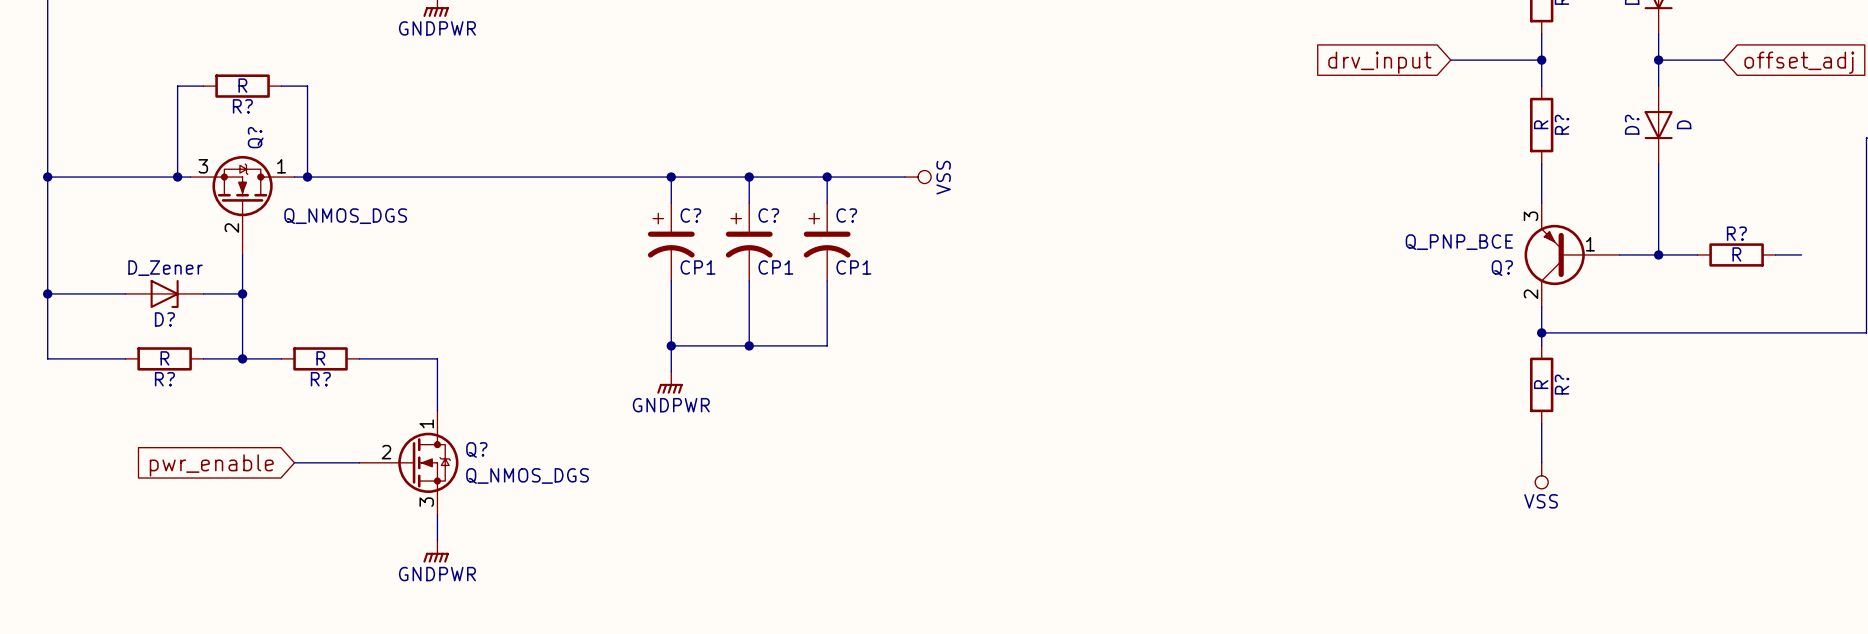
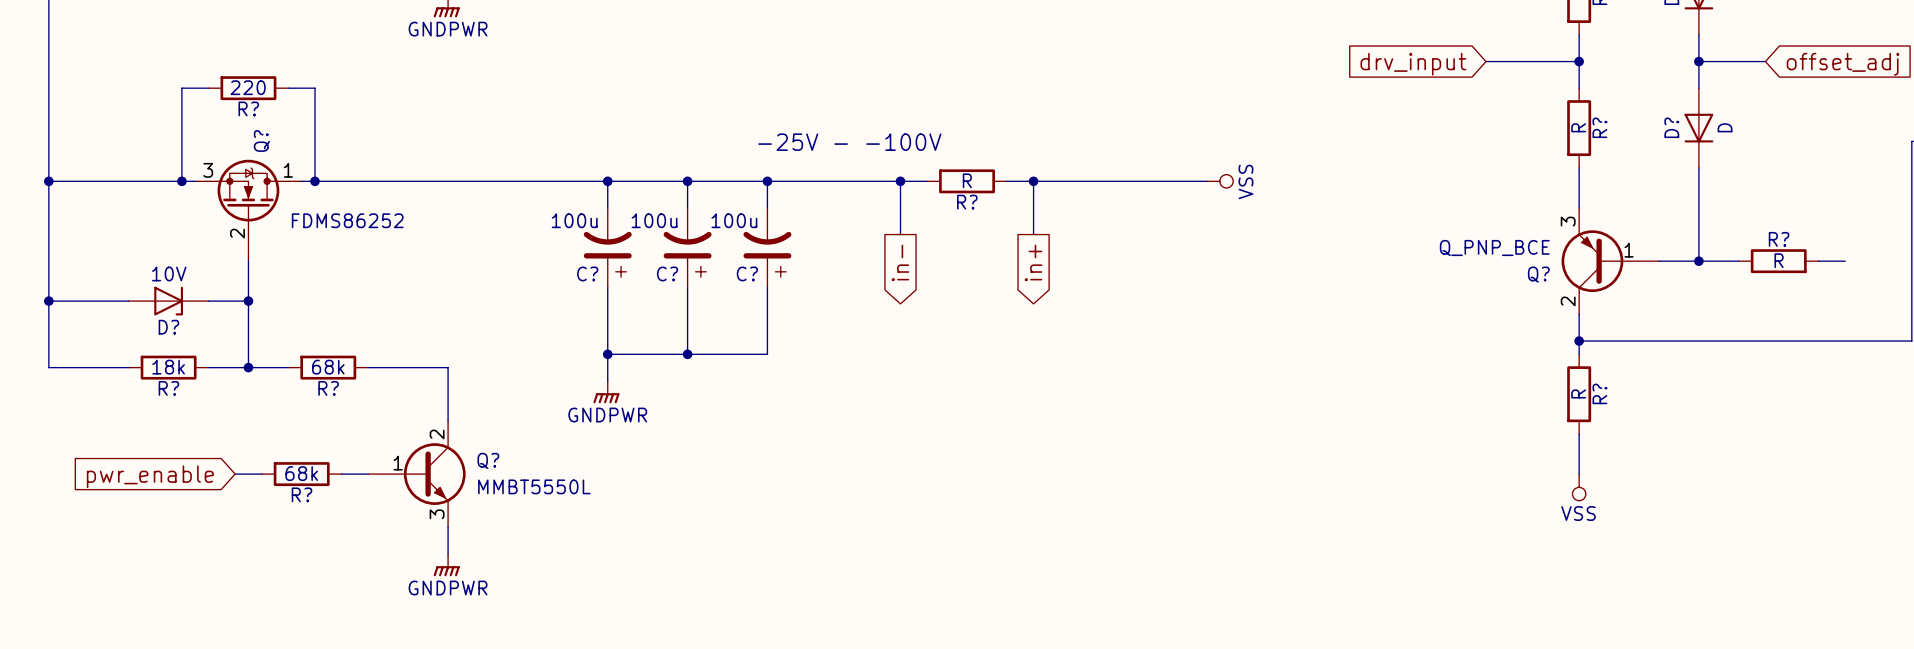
R? value: R (242, 85) -> 220 (248, 87)
text: none -> -25V - -100V (849, 142)
junction: none -> (607, 181)
wire: (827, 177) (827, 203) -> (607, 181) (607, 207)
junction position: (827, 177) -> (900, 181)
wire: none -> (900, 181) (900, 234)
power symbol: VSS (918, 177) -> none
R?: none -> R (967, 181)
wire: none -> (1006, 181) (1206, 181)
wire: none -> (1033, 181) (1033, 234)
junction: none -> (1033, 181)
power symbol: none -> VSS (1219, 181)
Q? value: Q_NMOS_DGS (345, 216) -> FDMS86252 (347, 220)
C? rotation: 0° (671, 235) -> 180° (687, 254)
C? rotation: 0° (749, 235) -> 180° (767, 254)
C?: none -> 100u (607, 247)
C?: CP1 (827, 241) -> none
global label: none -> in- (900, 262)
global label: none -> in+ (1033, 262)
C? value: CP1 (697, 267) -> 100u (654, 220)
C? value: CP1 (775, 267) -> 100u (734, 220)
D? value: D_Zener (165, 268) -> 10V (169, 273)
wire: none -> (607, 287) (607, 380)
wire: (827, 280) (827, 345) (749, 345) -> none
junction: none -> (607, 354)
wire: (671, 345) (671, 371) -> (687, 354) (607, 354)
junction: (749, 345) -> none
R? value: R (164, 358) -> 18k (168, 367)
R? value: R (320, 358) -> 68k (328, 367)
power symbol position: GNDPWR (669, 382) -> GNDPWR (606, 392)
Q? symbol: [359, 410, 459, 515] -> [368, 420, 466, 528]
wire: none -> (235, 474) (261, 474)
wire: (294, 462) (333, 462) -> none
R?: none -> 68k (301, 474)
global label position: pwr_enable (211, 465) -> pwr_enable (150, 476)
Q? value: Q_NMOS_DGS (527, 475) -> MMBT5550L (534, 486)

